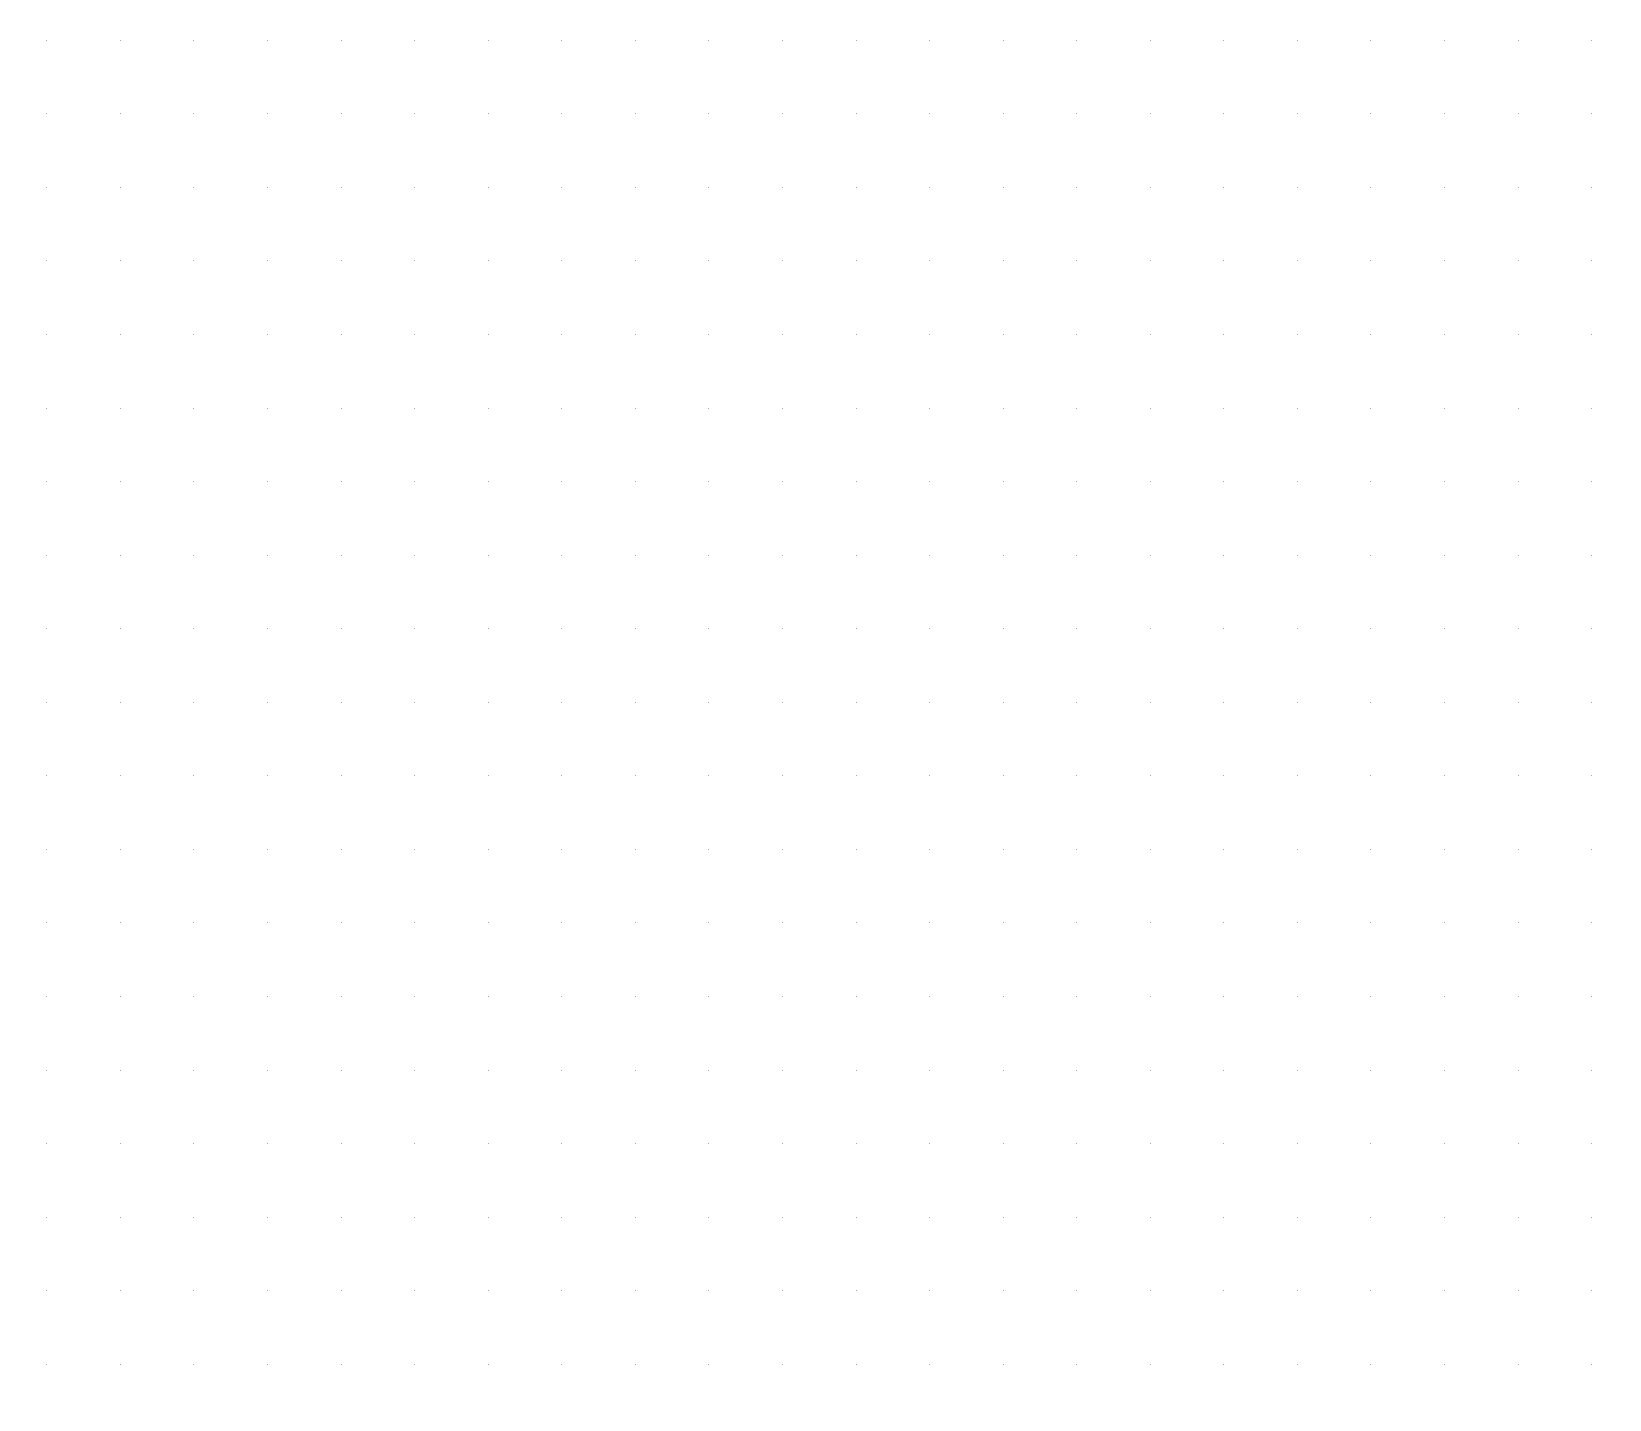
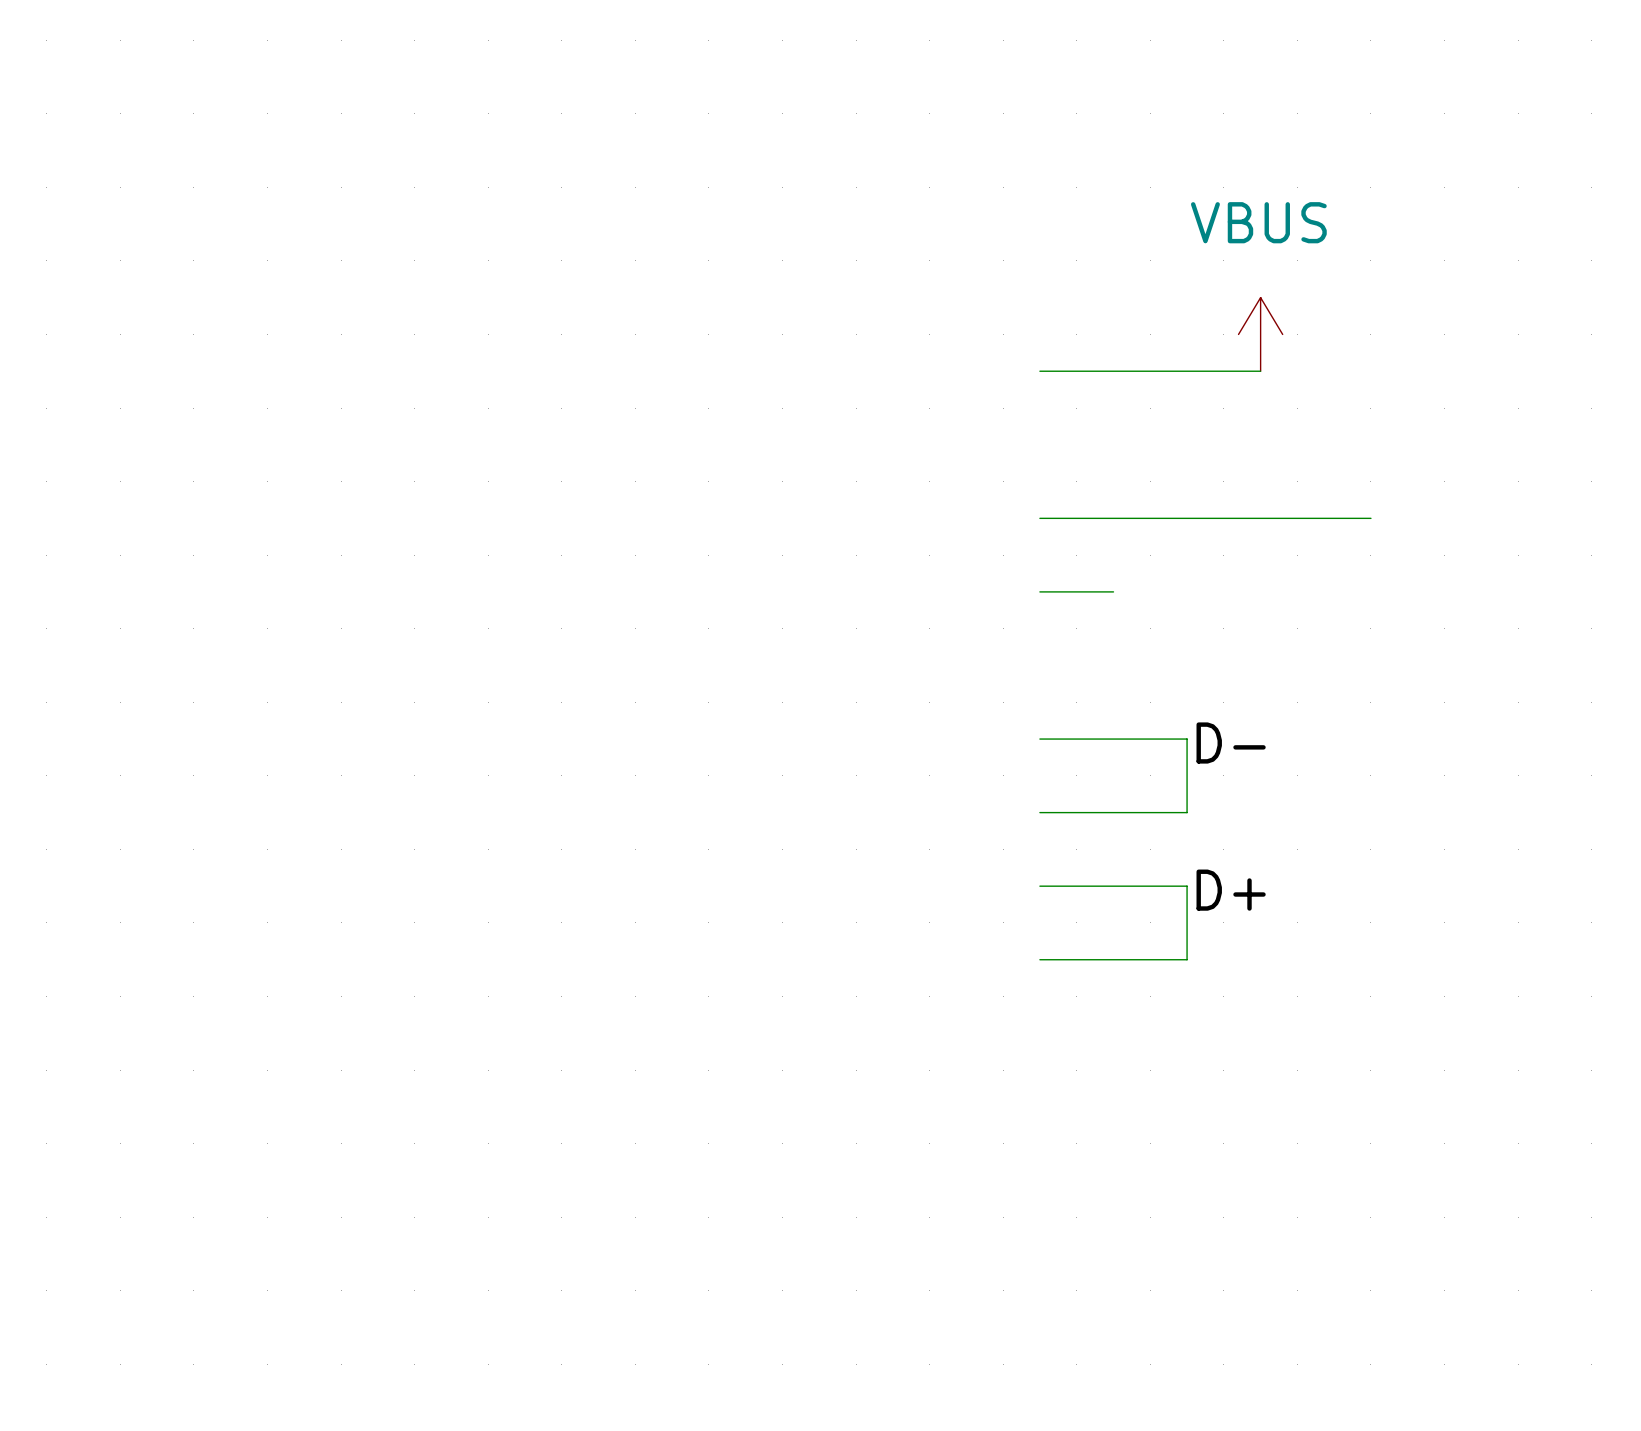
power symbol: none -> VBUS (1260, 334)
wire: none -> (1039, 371) (1260, 371)
wire: none -> (1039, 518) (1370, 518)
wire: none -> (1039, 591) (1113, 591)
wire: none -> (1039, 739) (1187, 739) (1187, 812) (1039, 812)
label: none -> D- (1231, 743)
wire: none -> (1039, 886) (1187, 886) (1187, 959) (1039, 959)
label: none -> D+ (1231, 890)

